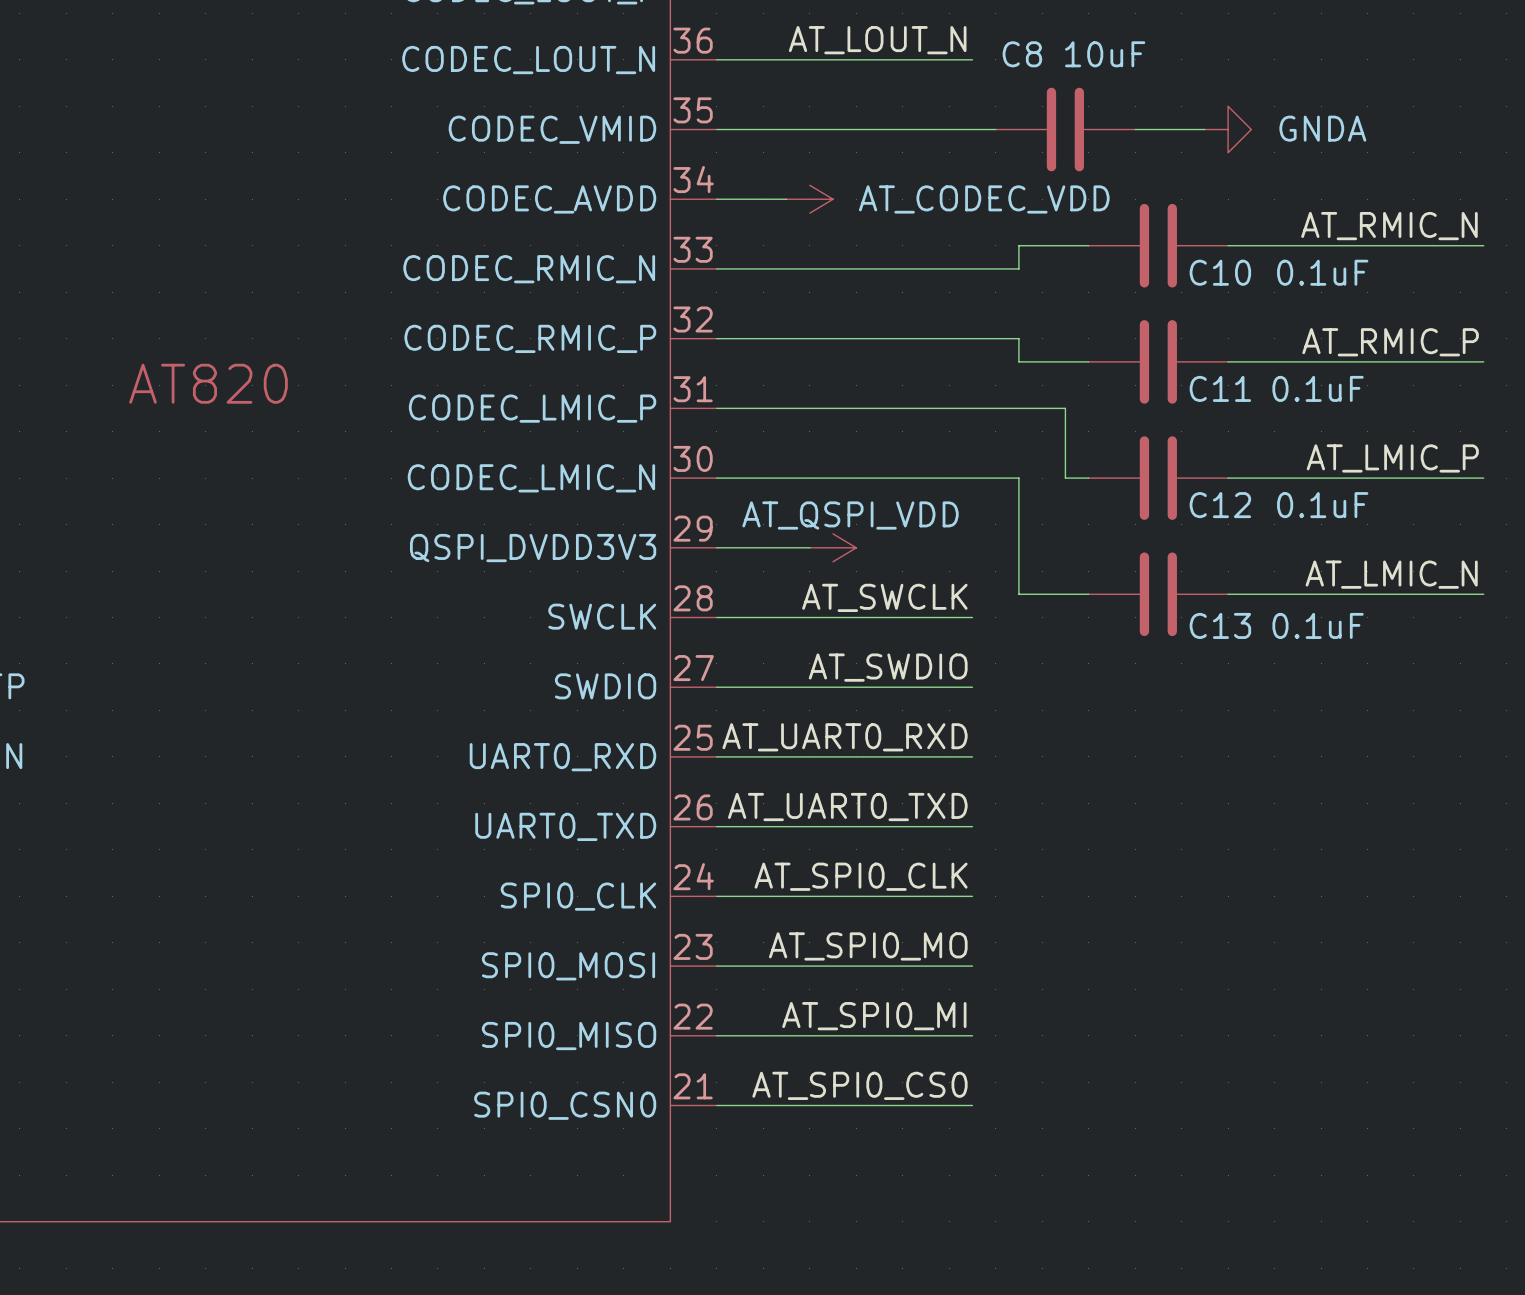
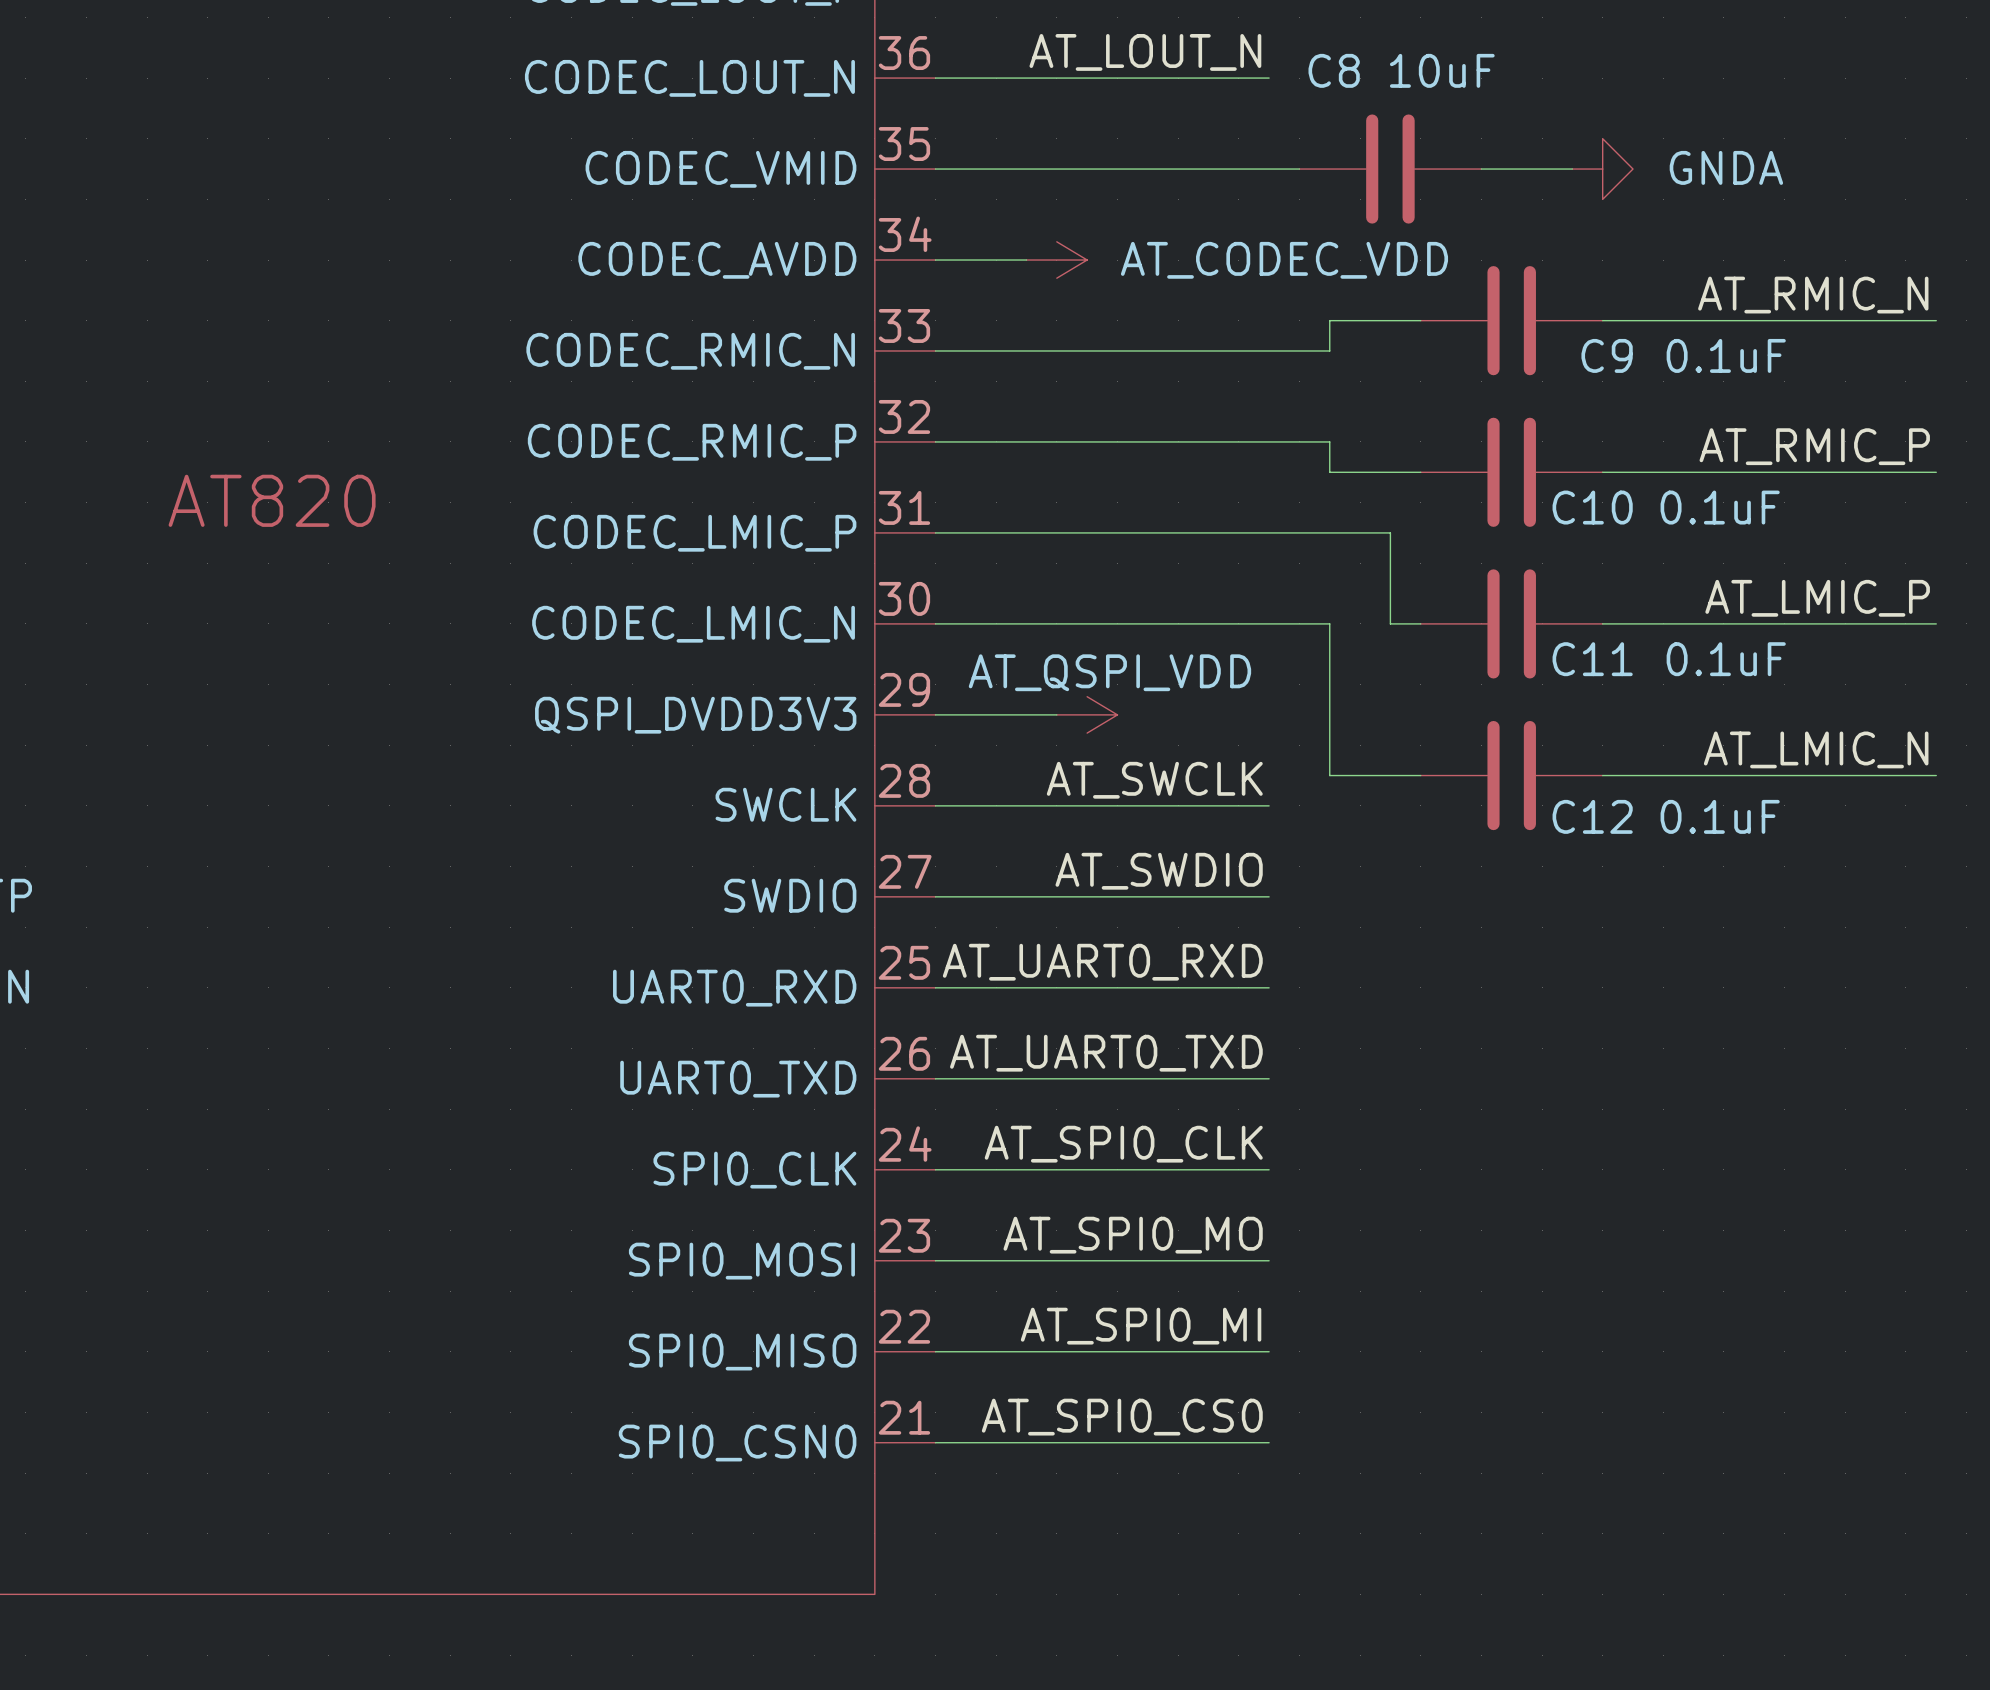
C10 name: C10 (1220, 272) -> C9 (1607, 355)
C11 name: C11 (1220, 388) -> C10 (1592, 507)
C12 name: C12 (1220, 505) -> C11 (1592, 659)
C13 name: C13 (1220, 625) -> C12 (1592, 816)

